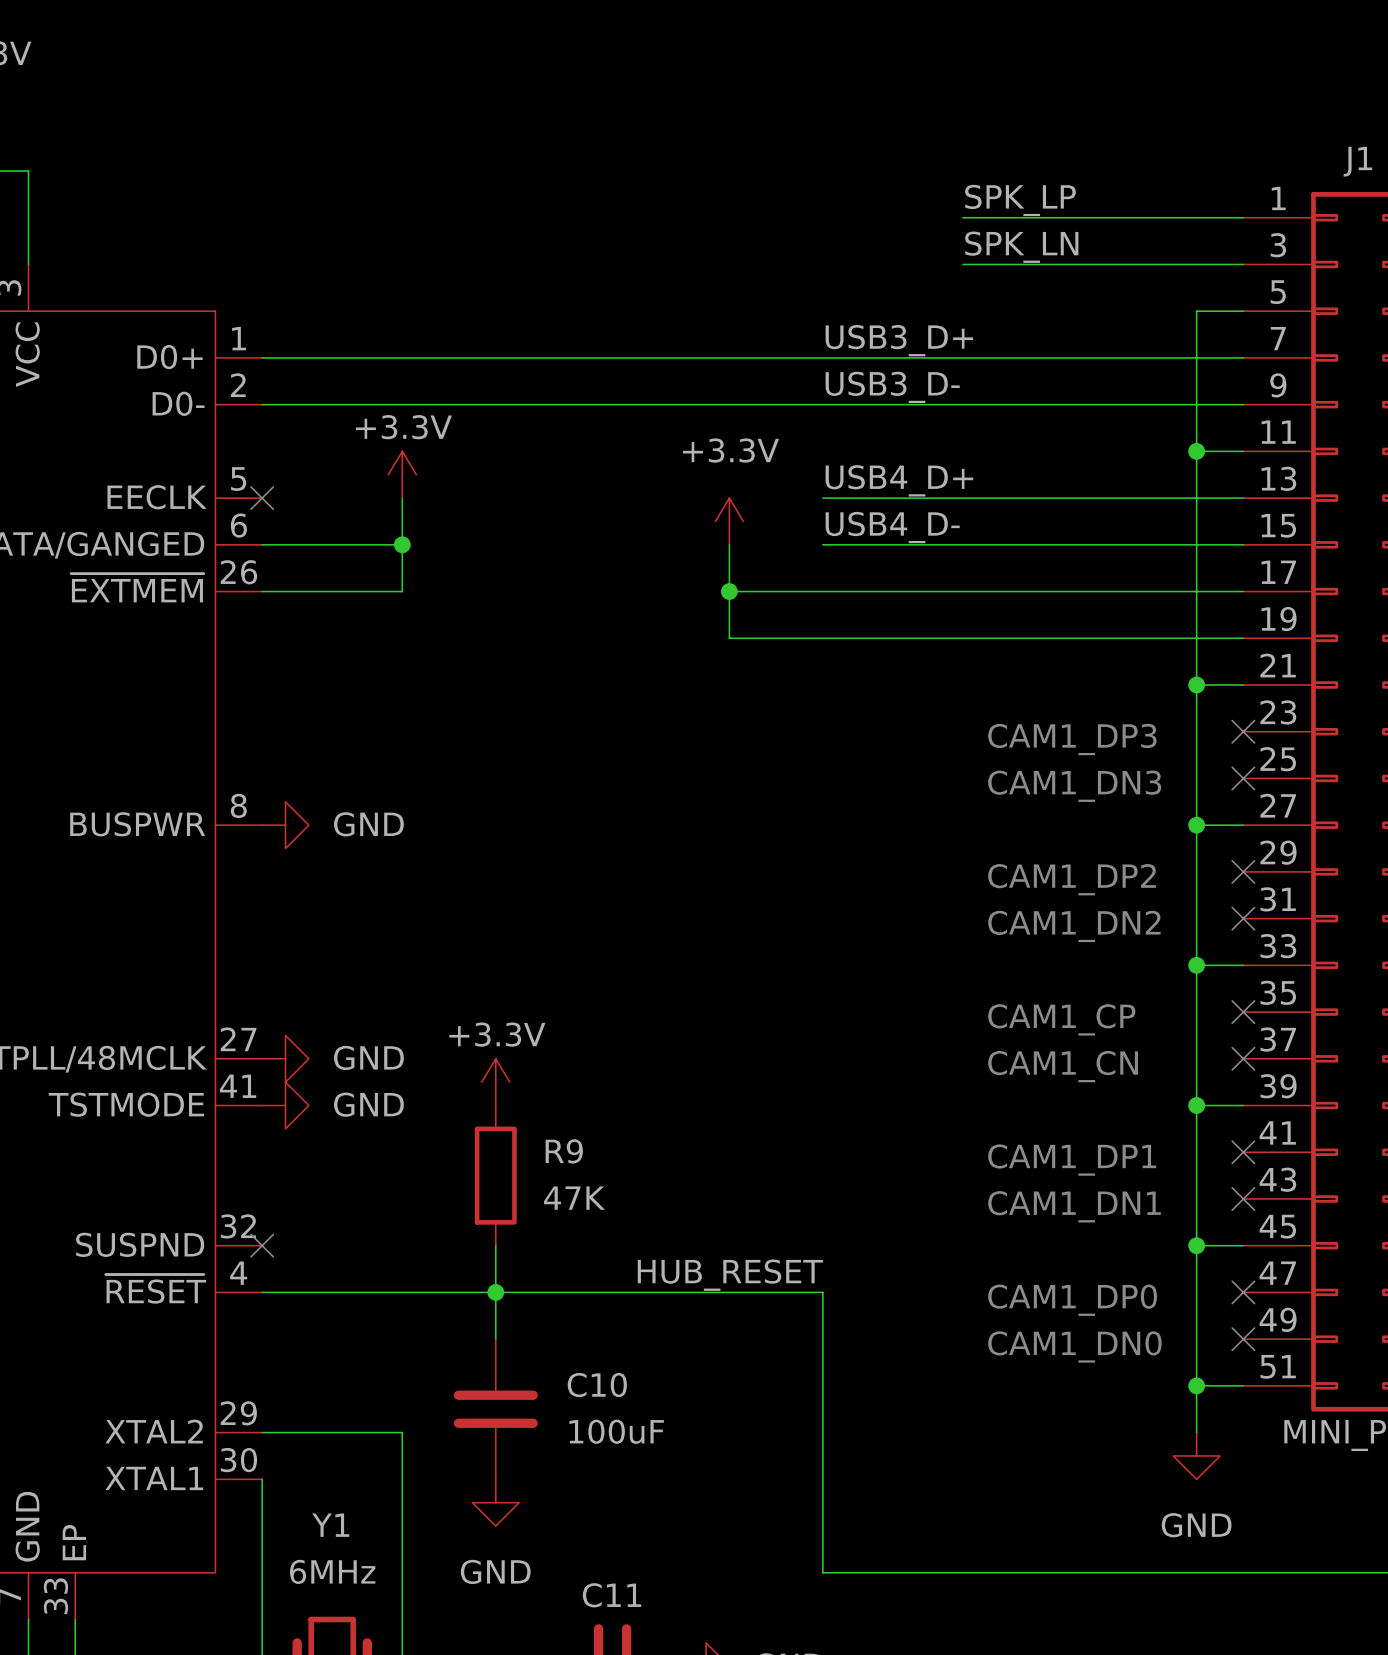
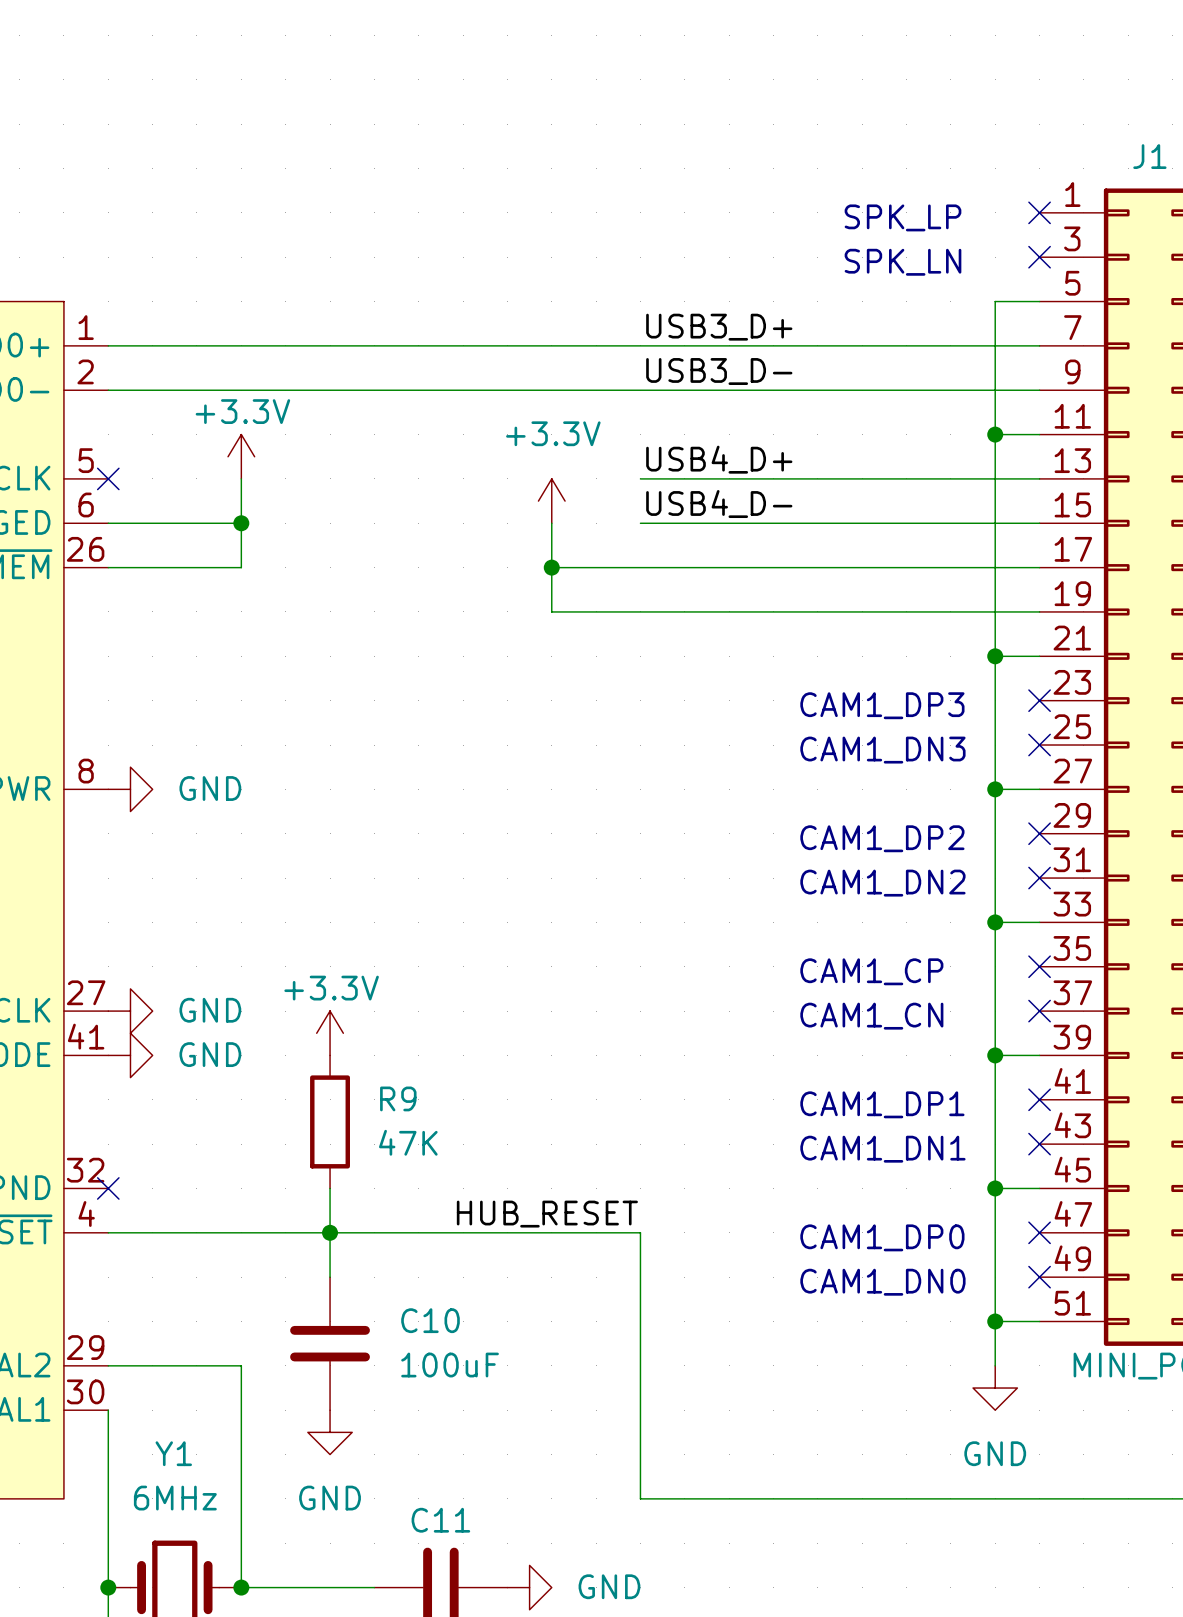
label: SPK_LP (1020, 200) -> none
wire: (963, 217) (1243, 217) -> none
no-connect mark: none -> (1039, 212)
text: none -> SPK_LP (903, 217)
label: SPK_LN (1021, 247) -> none
wire: (963, 264) (1243, 264) -> none
no-connect mark: none -> (1039, 257)
text: none -> SPK_LN (903, 262)

